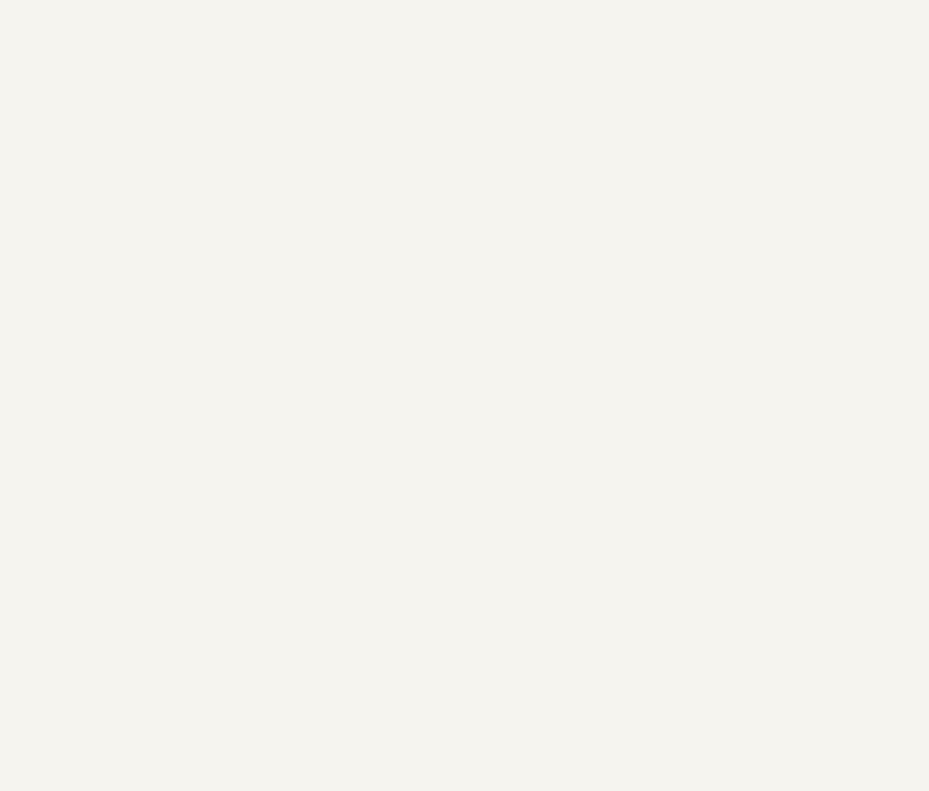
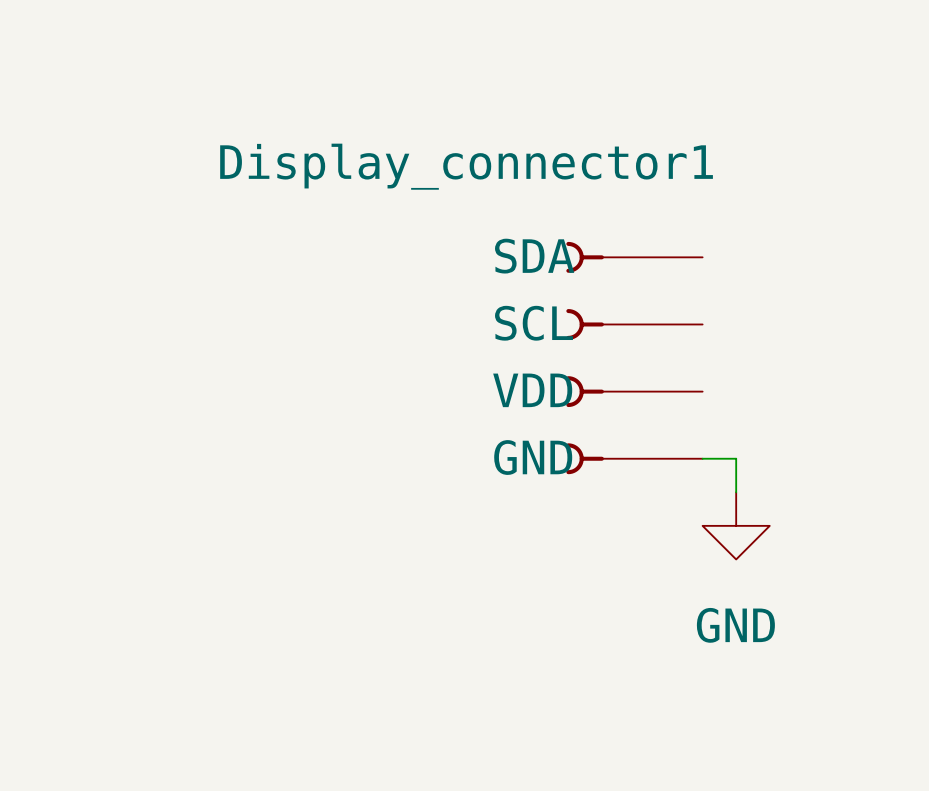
Display_connector1: none -> (634, 358)
wire: none -> (702, 458) (736, 458) (736, 492)
power symbol: none -> GND (736, 525)

